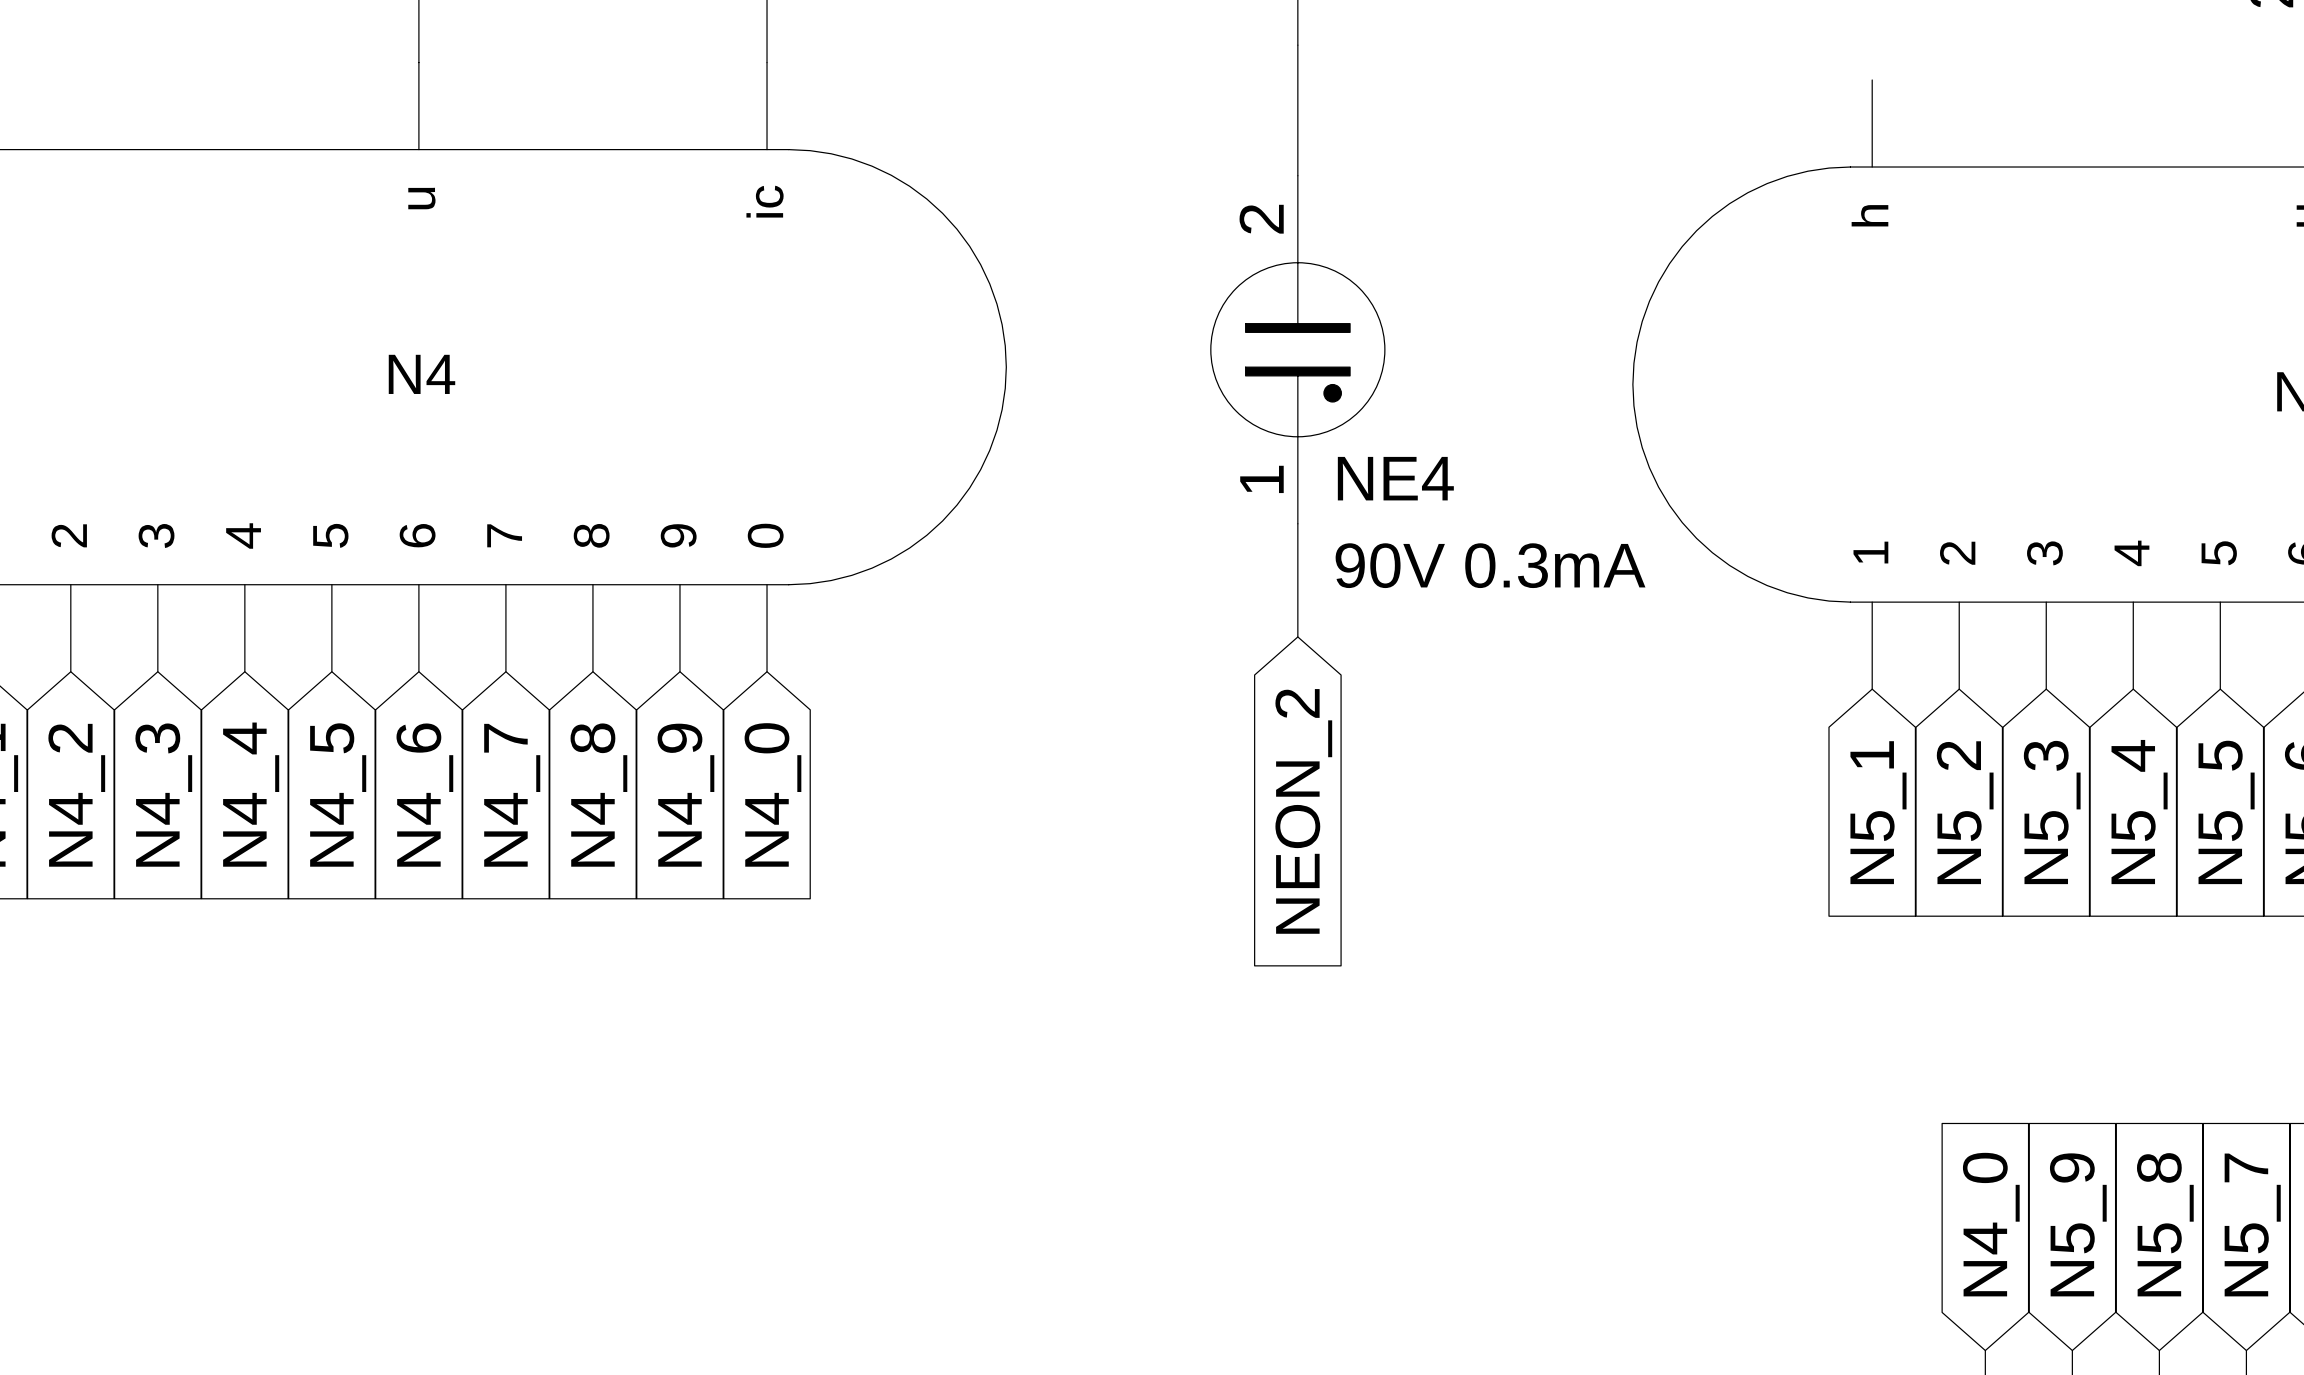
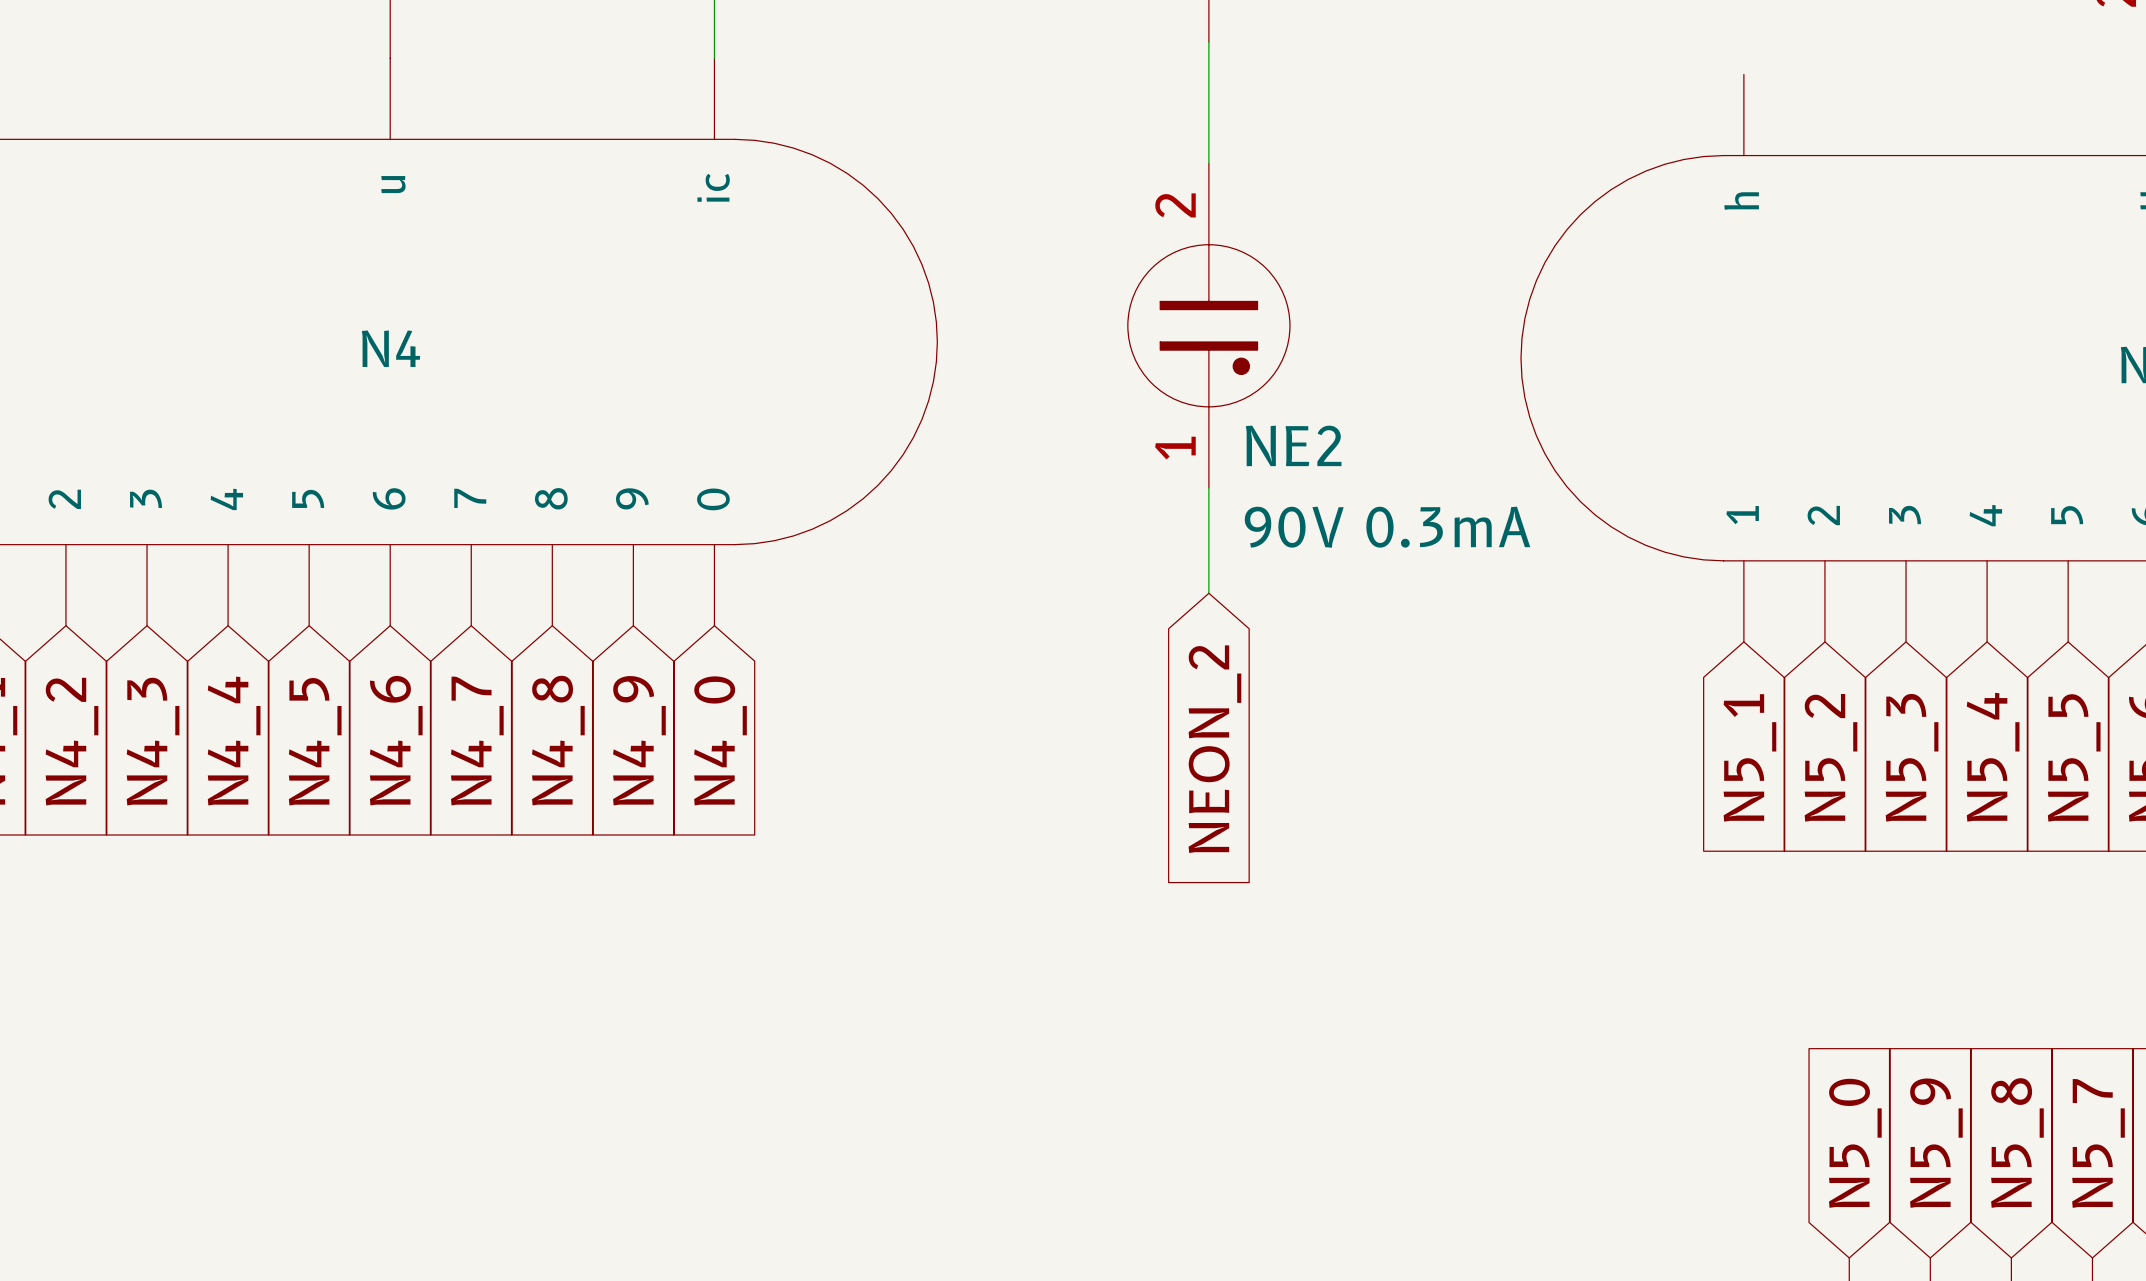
NE4 name: NE4 (1395, 478) -> NE2 (1293, 445)
global label: N4_0 (1991, 1224) -> N5_0 (1855, 1143)

